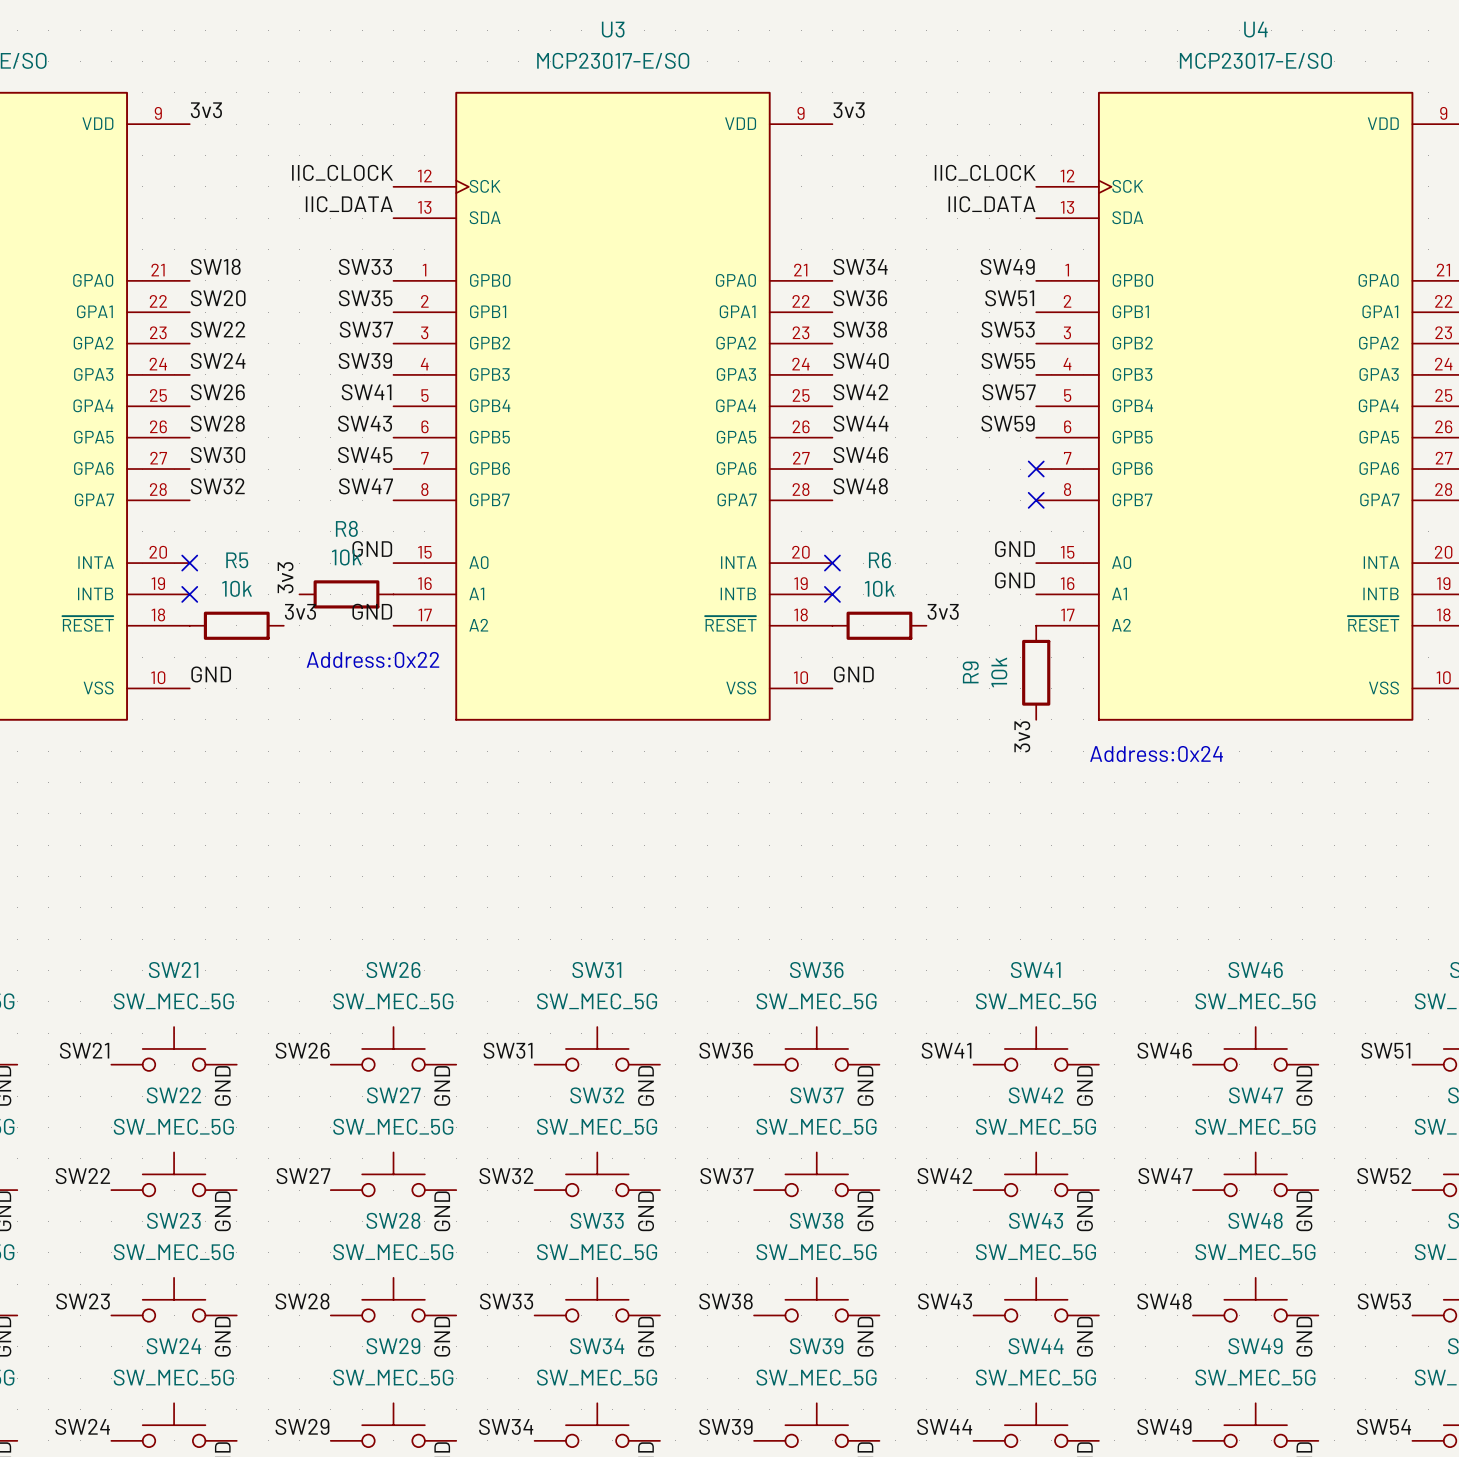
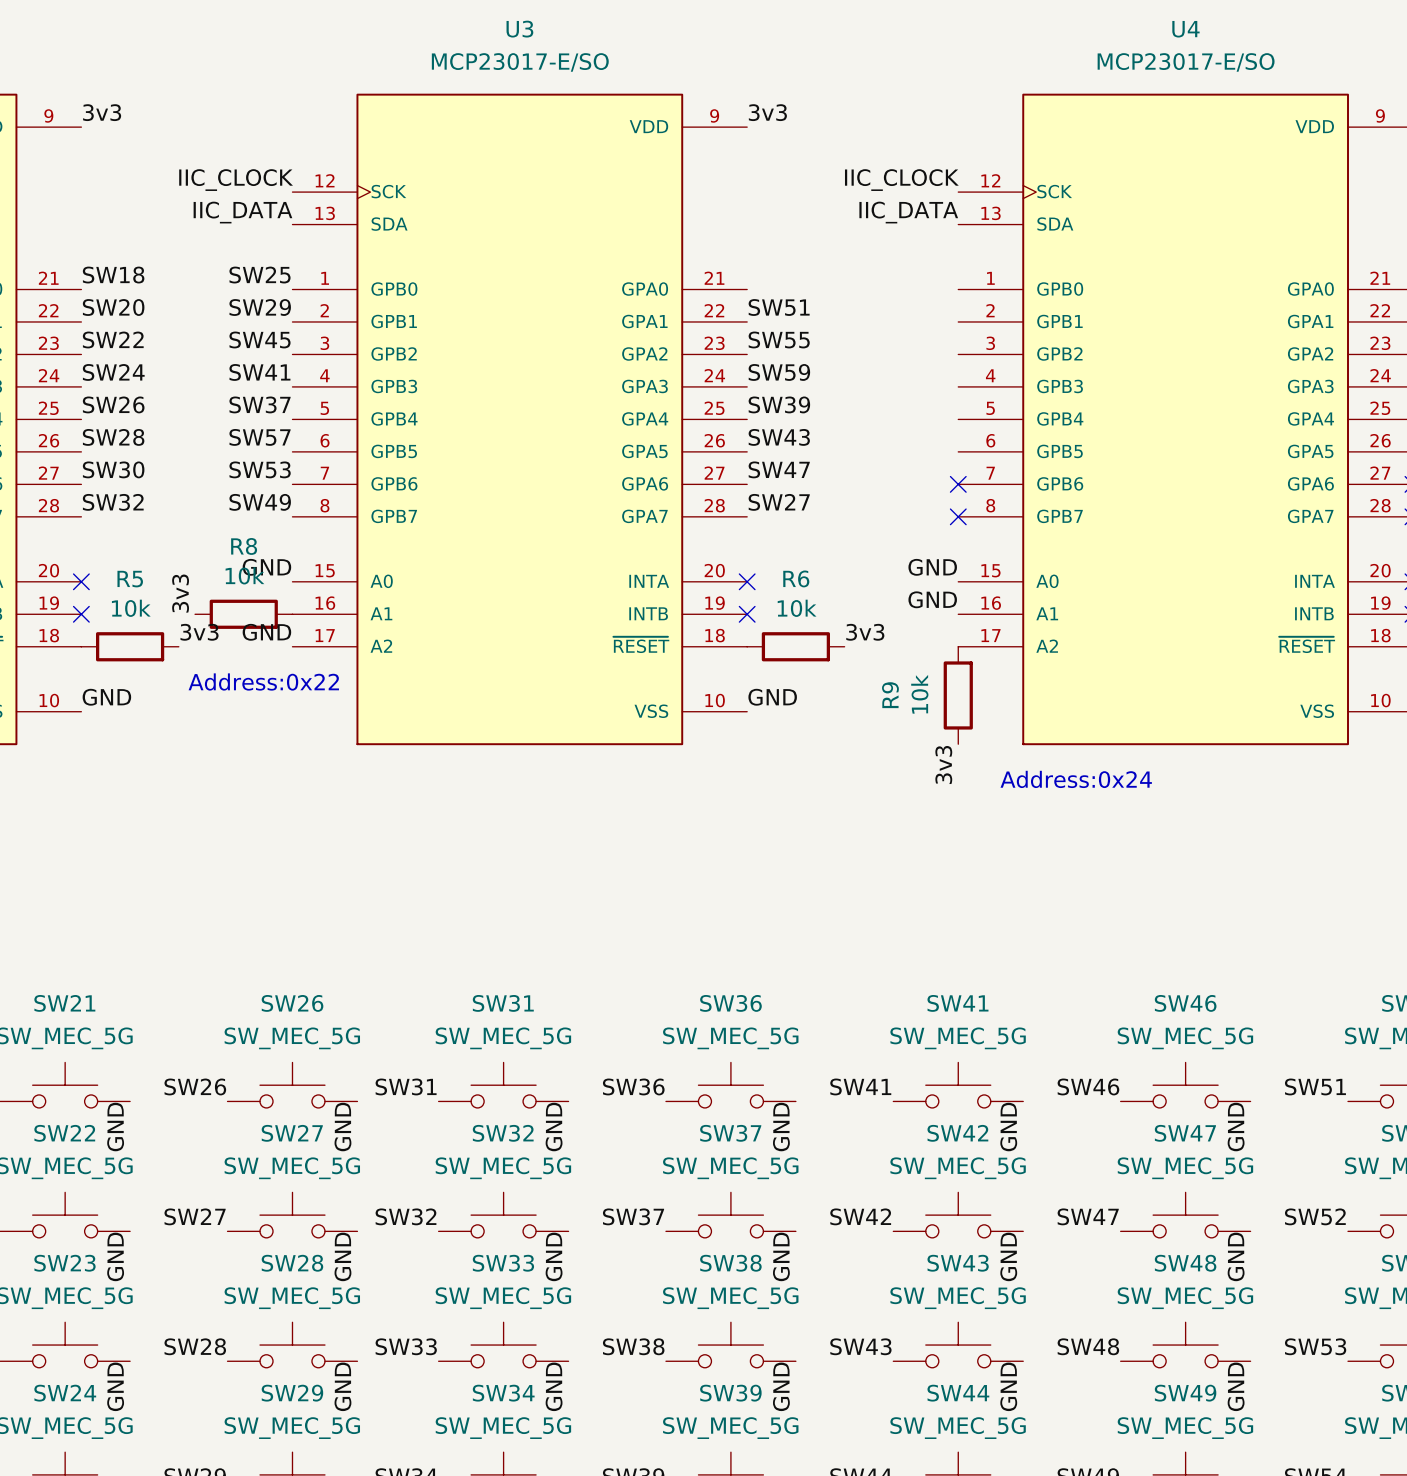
label: SW33 (365, 266) -> SW25 (259, 275)
label: SW34 (860, 266) -> none
label: SW49 (1007, 266) -> none
label: SW35 (365, 298) -> SW29 (260, 307)
label: SW36 (860, 298) -> SW51 (779, 307)
label: SW51 (1009, 298) -> none
label: SW37 (366, 329) -> SW45 (259, 339)
label: SW38 (860, 329) -> SW55 (779, 339)
label: SW53 (1008, 329) -> none
label: SW39 (365, 360) -> SW41 (259, 372)
label: SW40 (861, 360) -> SW59 (779, 372)
label: SW55 (1008, 360) -> none
label: SW41 (366, 392) -> SW37 (260, 404)
label: SW42 (860, 392) -> SW39 (779, 404)
label: SW57 (1009, 392) -> none
label: SW43 (365, 423) -> SW57 (260, 437)
label: SW44 (861, 423) -> SW43 (779, 437)
label: SW59 (1008, 423) -> none
label: SW45 (365, 455) -> SW53 (260, 469)
label: SW46 (860, 455) -> SW47 (779, 469)
label: SW47 (366, 486) -> SW49 (260, 502)
label: SW48 (860, 486) -> SW27 (779, 502)

